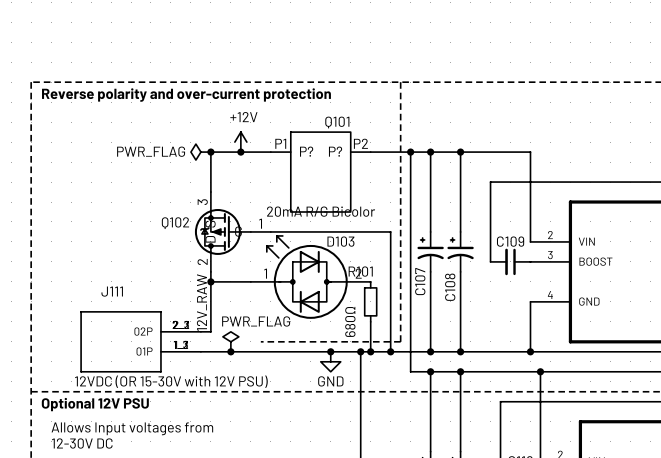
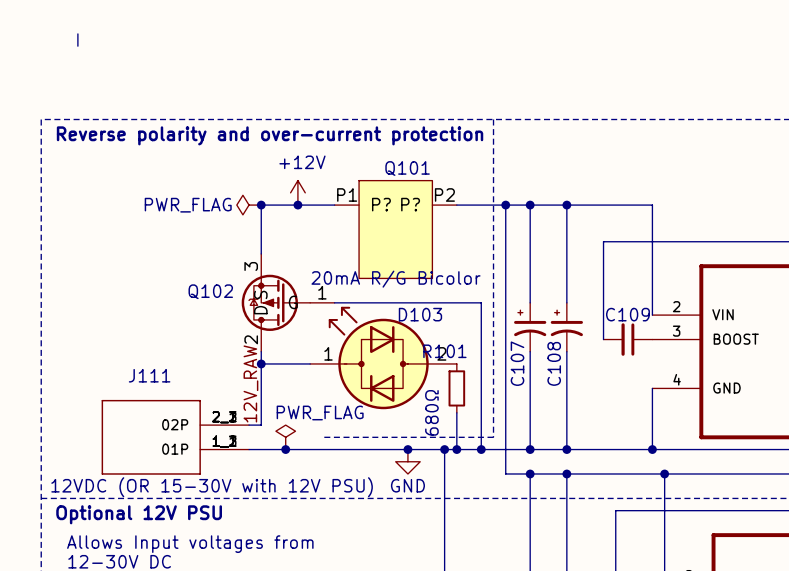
wire: none -> (77, 33) (77, 46)

